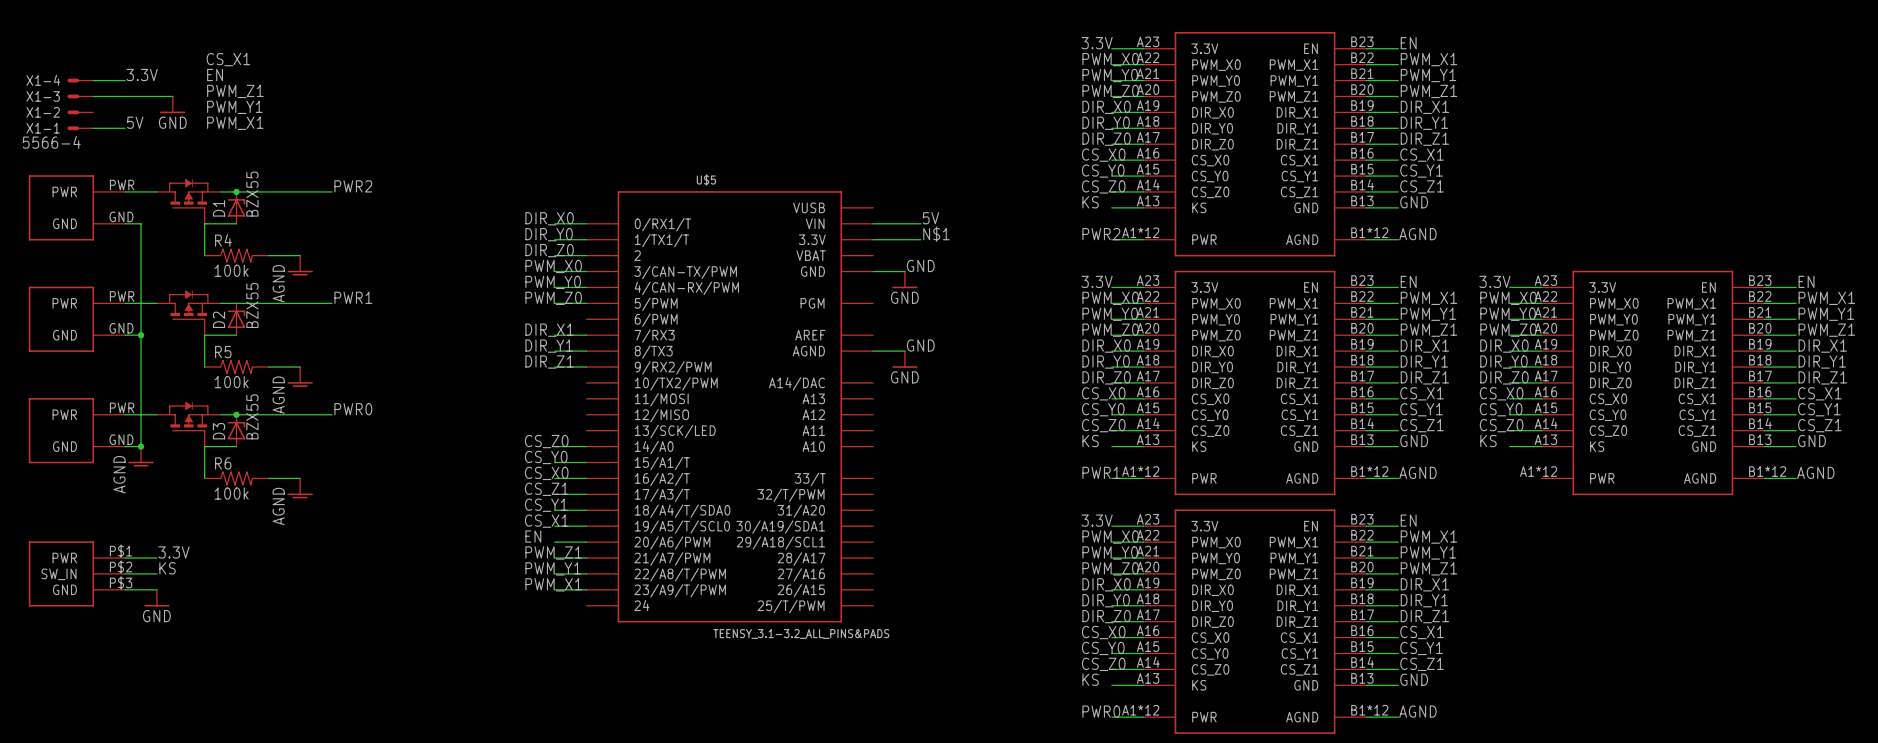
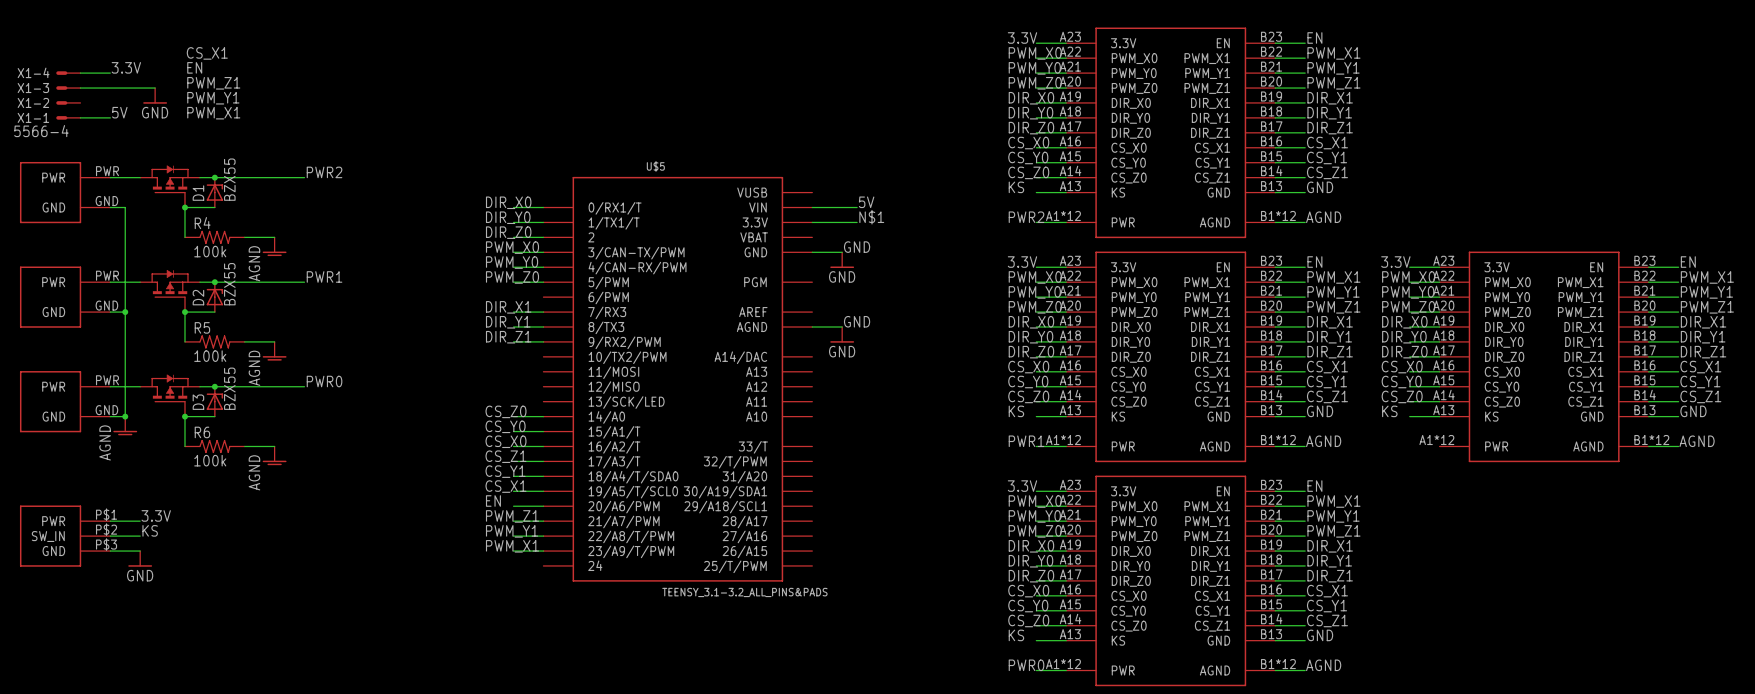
junction: none -> (184, 207)
junction: none -> (214, 282)
junction: none -> (184, 312)
junction: none -> (184, 416)

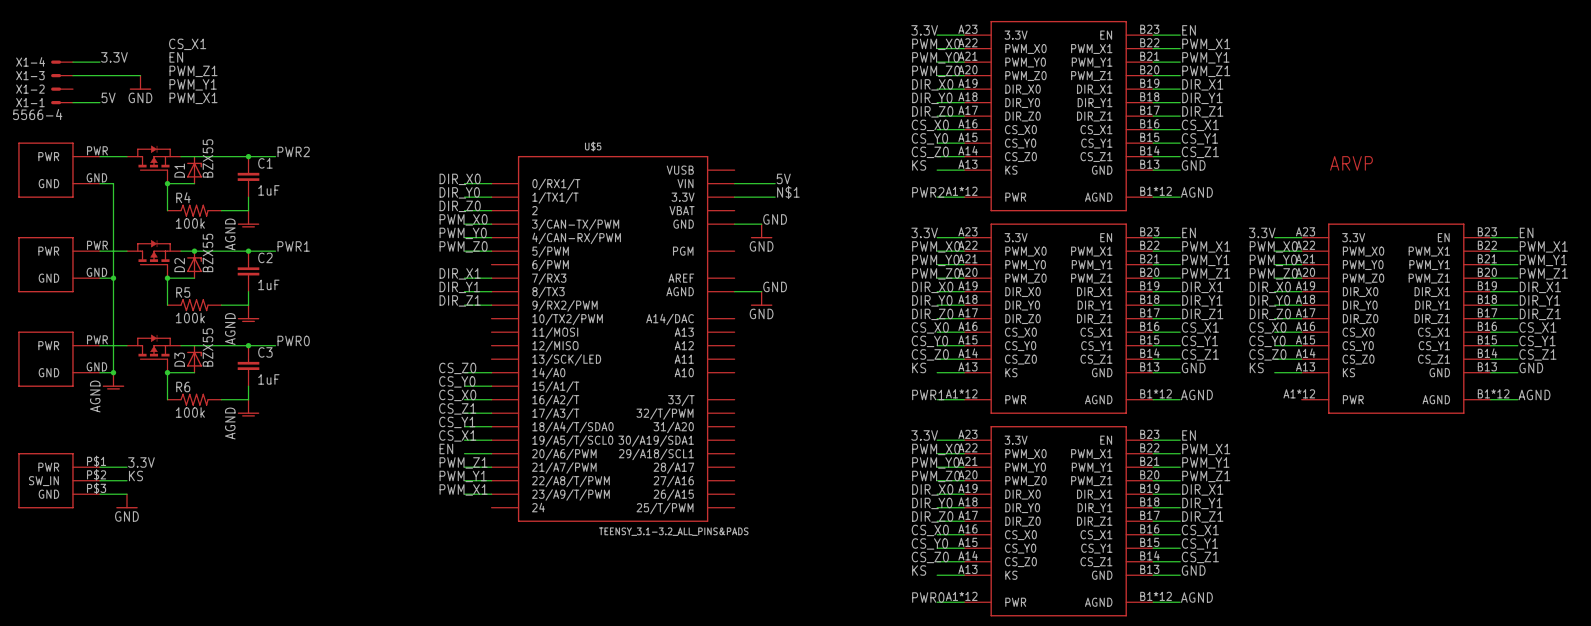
junction: (214, 177) -> none
junction: none -> (248, 156)
part: none -> (1351, 163)
C1: none -> 1uF (248, 176)
wire: none -> (248, 197) (248, 210)
junction: none -> (248, 251)
C2: none -> 1uF (248, 271)
wire: none -> (248, 291) (248, 305)
junction: (214, 386) -> none
junction: none -> (248, 345)
C3: none -> 1uF (248, 365)
wire: none -> (248, 386) (248, 399)

